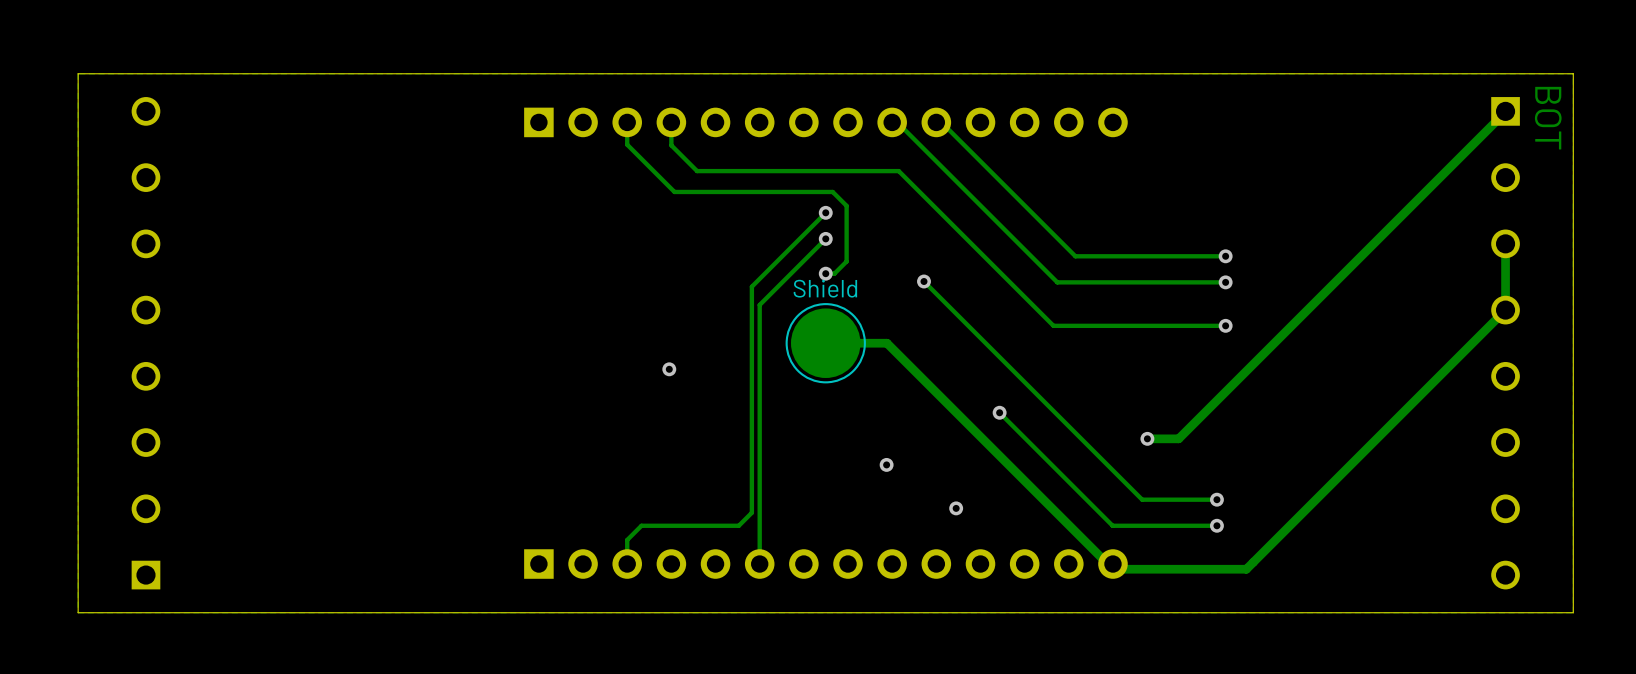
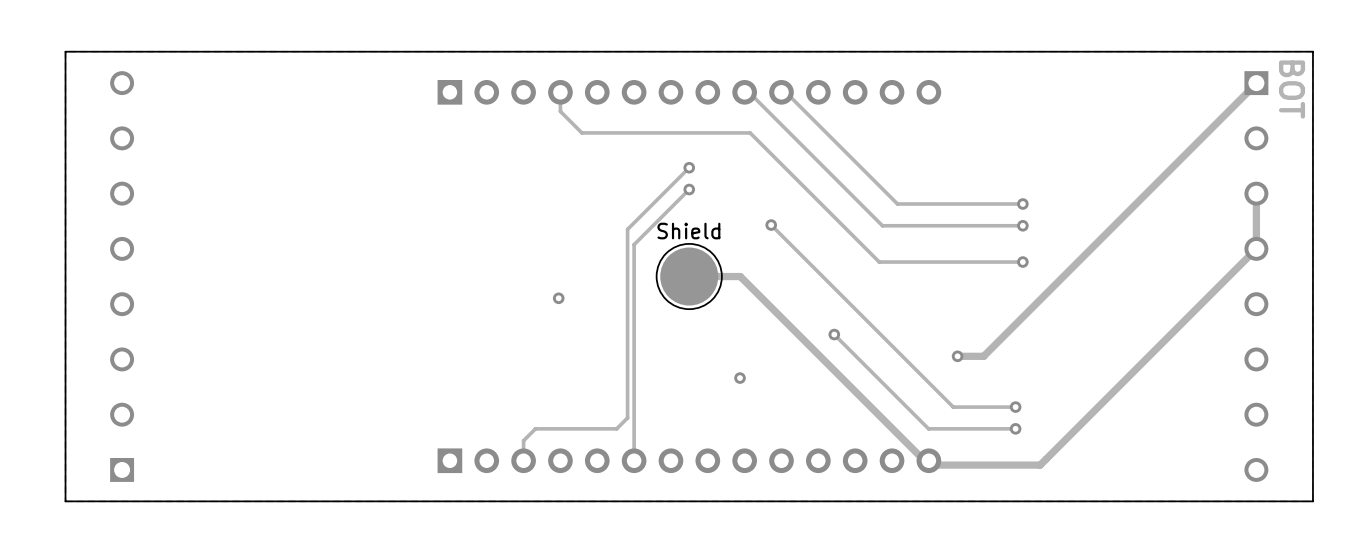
track: (627, 122) (627, 144) (674, 191) (832, 191) (846, 205) (846, 261) (834, 273) (825, 273) -> none
via: (825, 273) -> none
via: (956, 508) -> none

